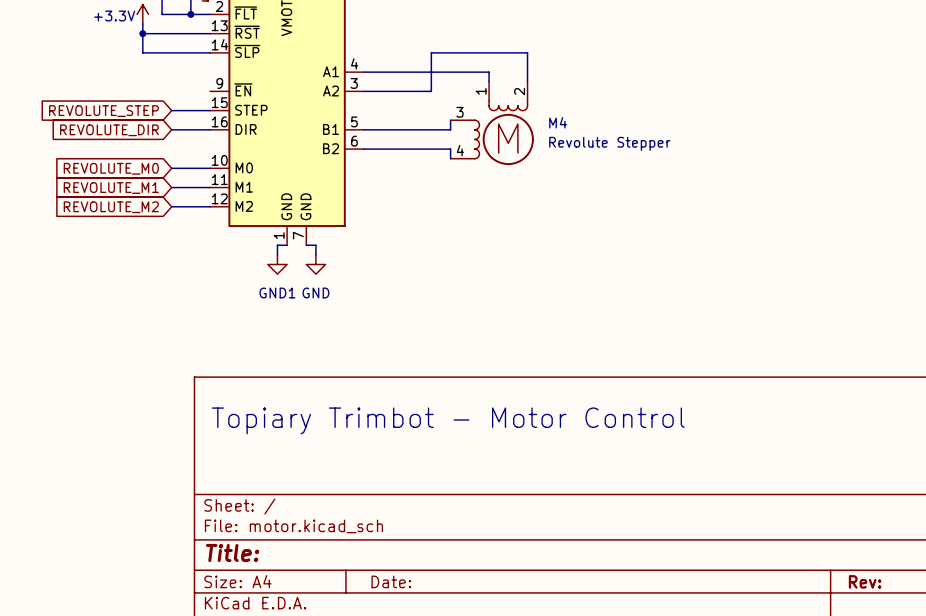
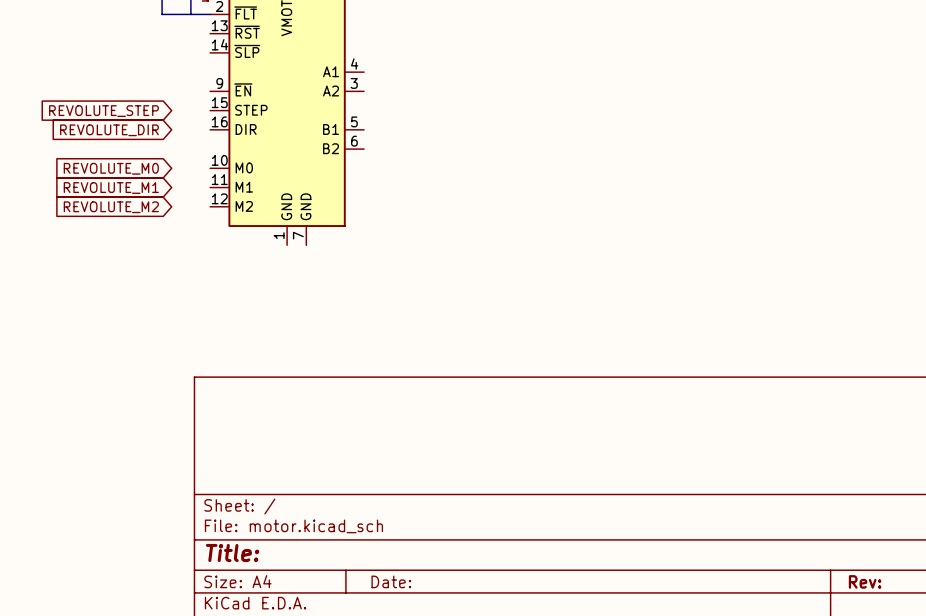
power symbol: +3.3V (142, 14) -> none
junction: (190, 14) -> none
wire: (142, 24) (142, 52) (210, 52) -> none
wire: (142, 33) (210, 33) -> none
junction: (142, 33) -> none
wire: (364, 72) (489, 72) (489, 81) -> none
wire: (527, 81) (527, 52) (431, 52) (431, 91) (364, 91) -> none
wire: (171, 110) (210, 110) -> none
wire: (450, 120) (450, 129) (364, 129) -> none
M4: Revolute Stepper (492, 123) -> none
wire: (171, 129) (210, 129) -> none
wire: (364, 149) (450, 149) (450, 158) -> none
wire: (171, 168) (210, 168) -> none
wire: (171, 187) (210, 187) -> none
wire: (171, 206) (210, 206) -> none
wire: (287, 245) (277, 245) (277, 254) -> none
wire: (306, 245) (315, 245) (315, 254) -> none
power symbol: GND1 (277, 264) -> none
power symbol: GND (315, 264) -> none
text: Topiary Trimbot - Motor Control (448, 420) -> none

